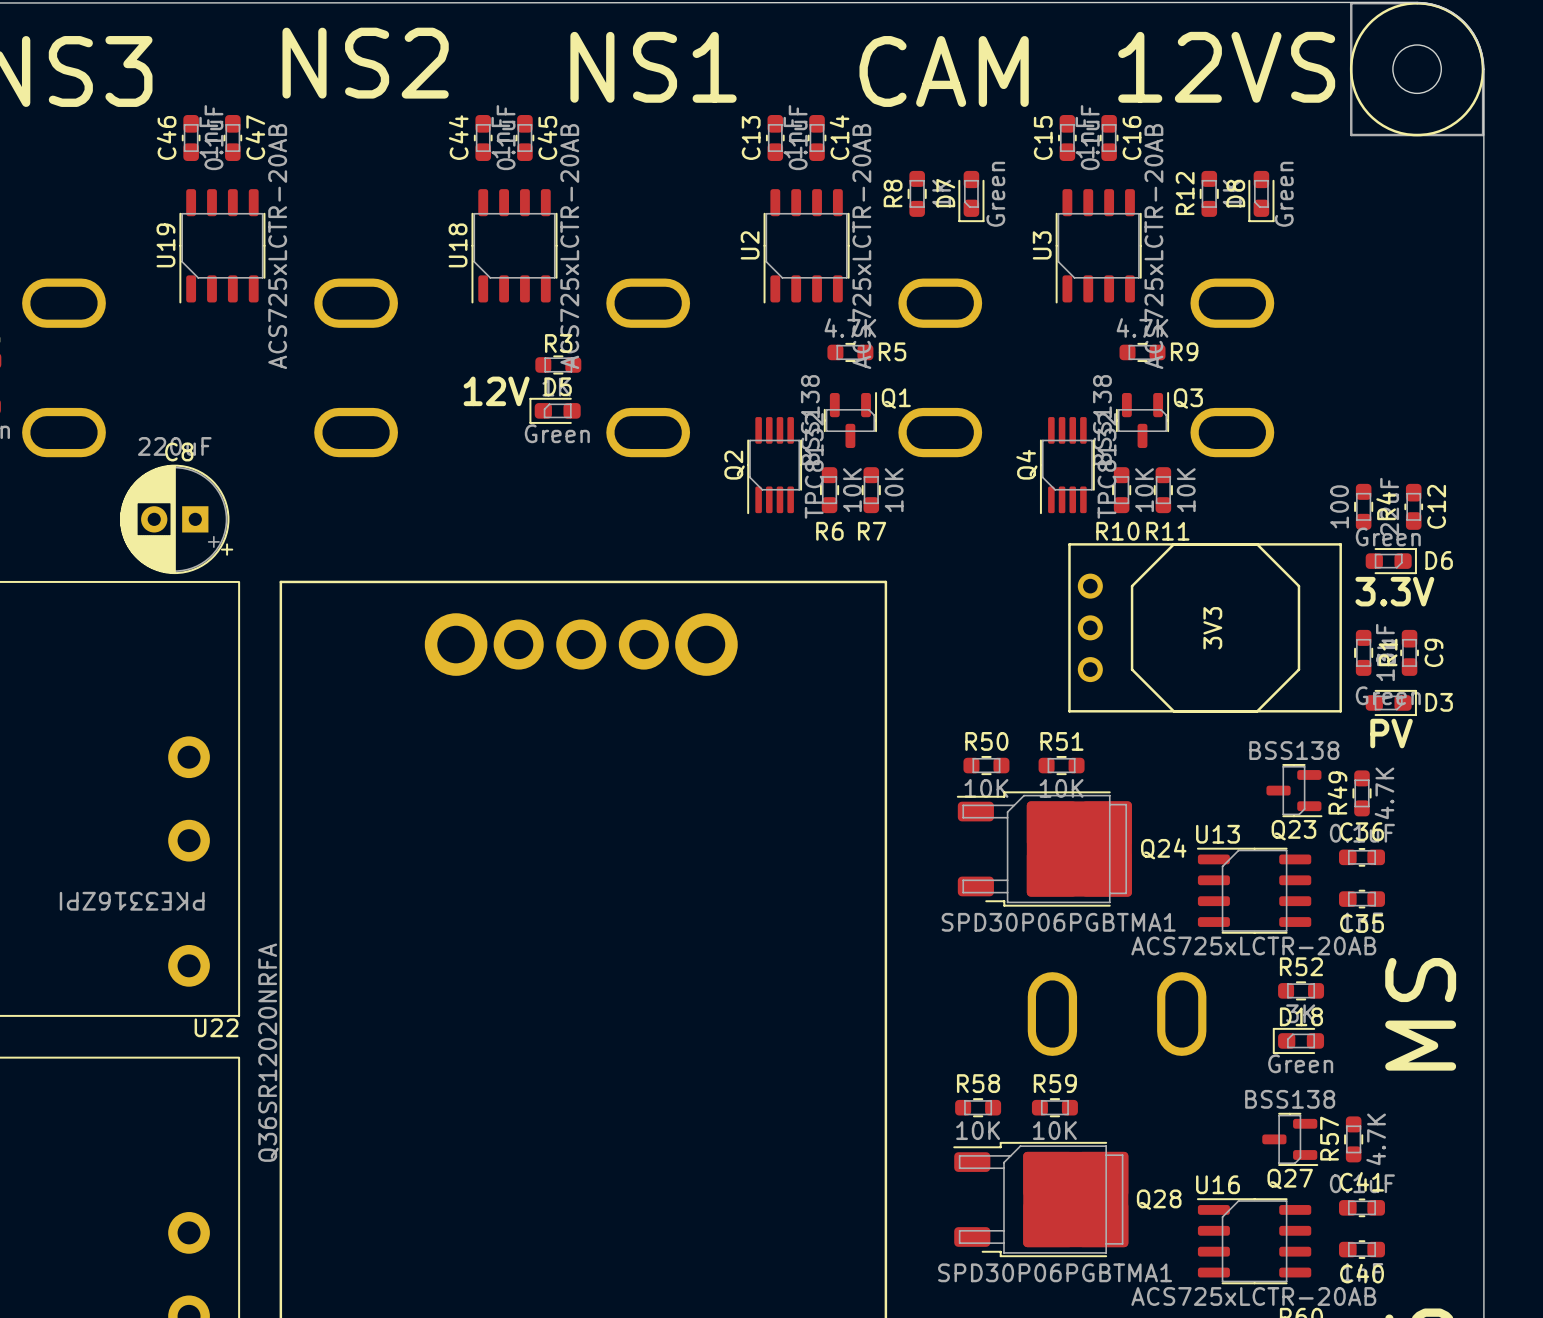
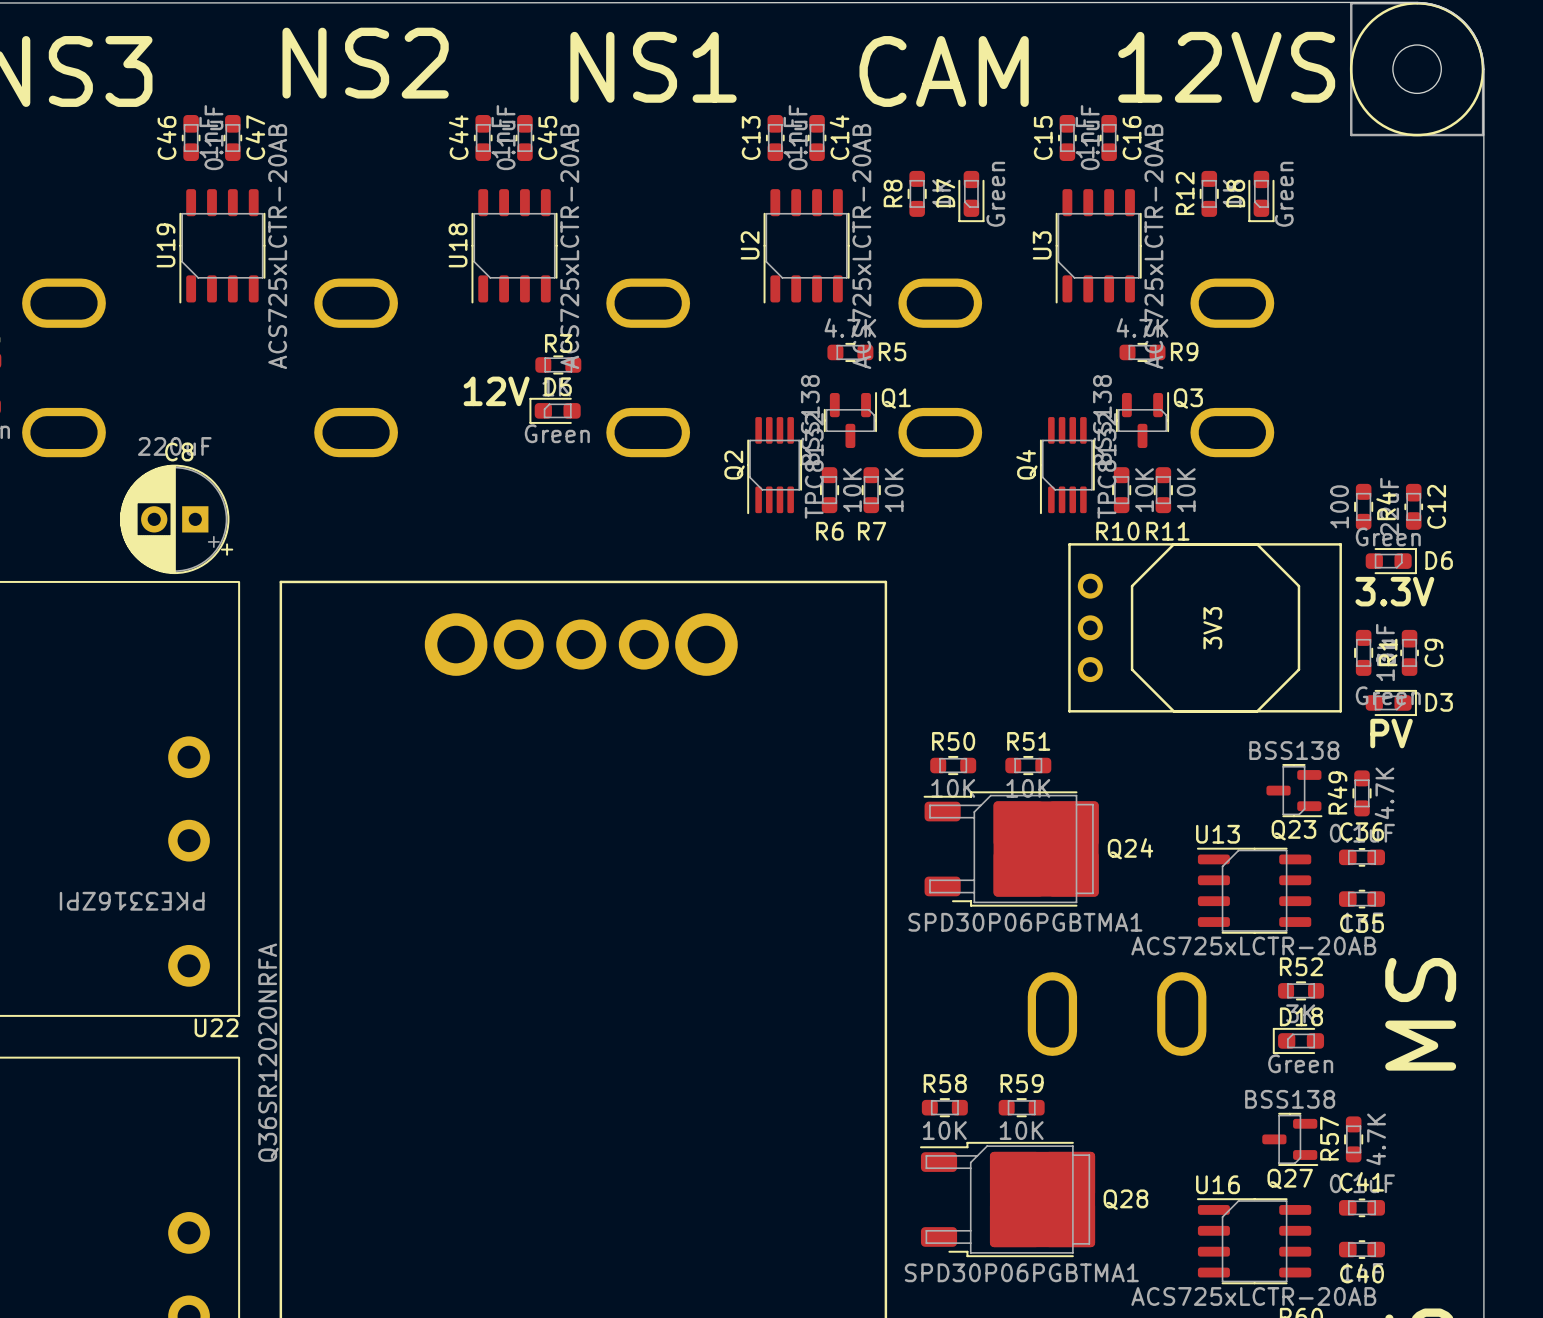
R50 position: (986, 765) -> (953, 765)
R51 position: (1061, 765) -> (1028, 765)
Q24 position: (1044, 849) -> (1011, 848)
R58 position: (978, 1107) -> (944, 1107)
R59 position: (1054, 1107) -> (1021, 1107)
Q28 position: (1040, 1199) -> (1007, 1199)

